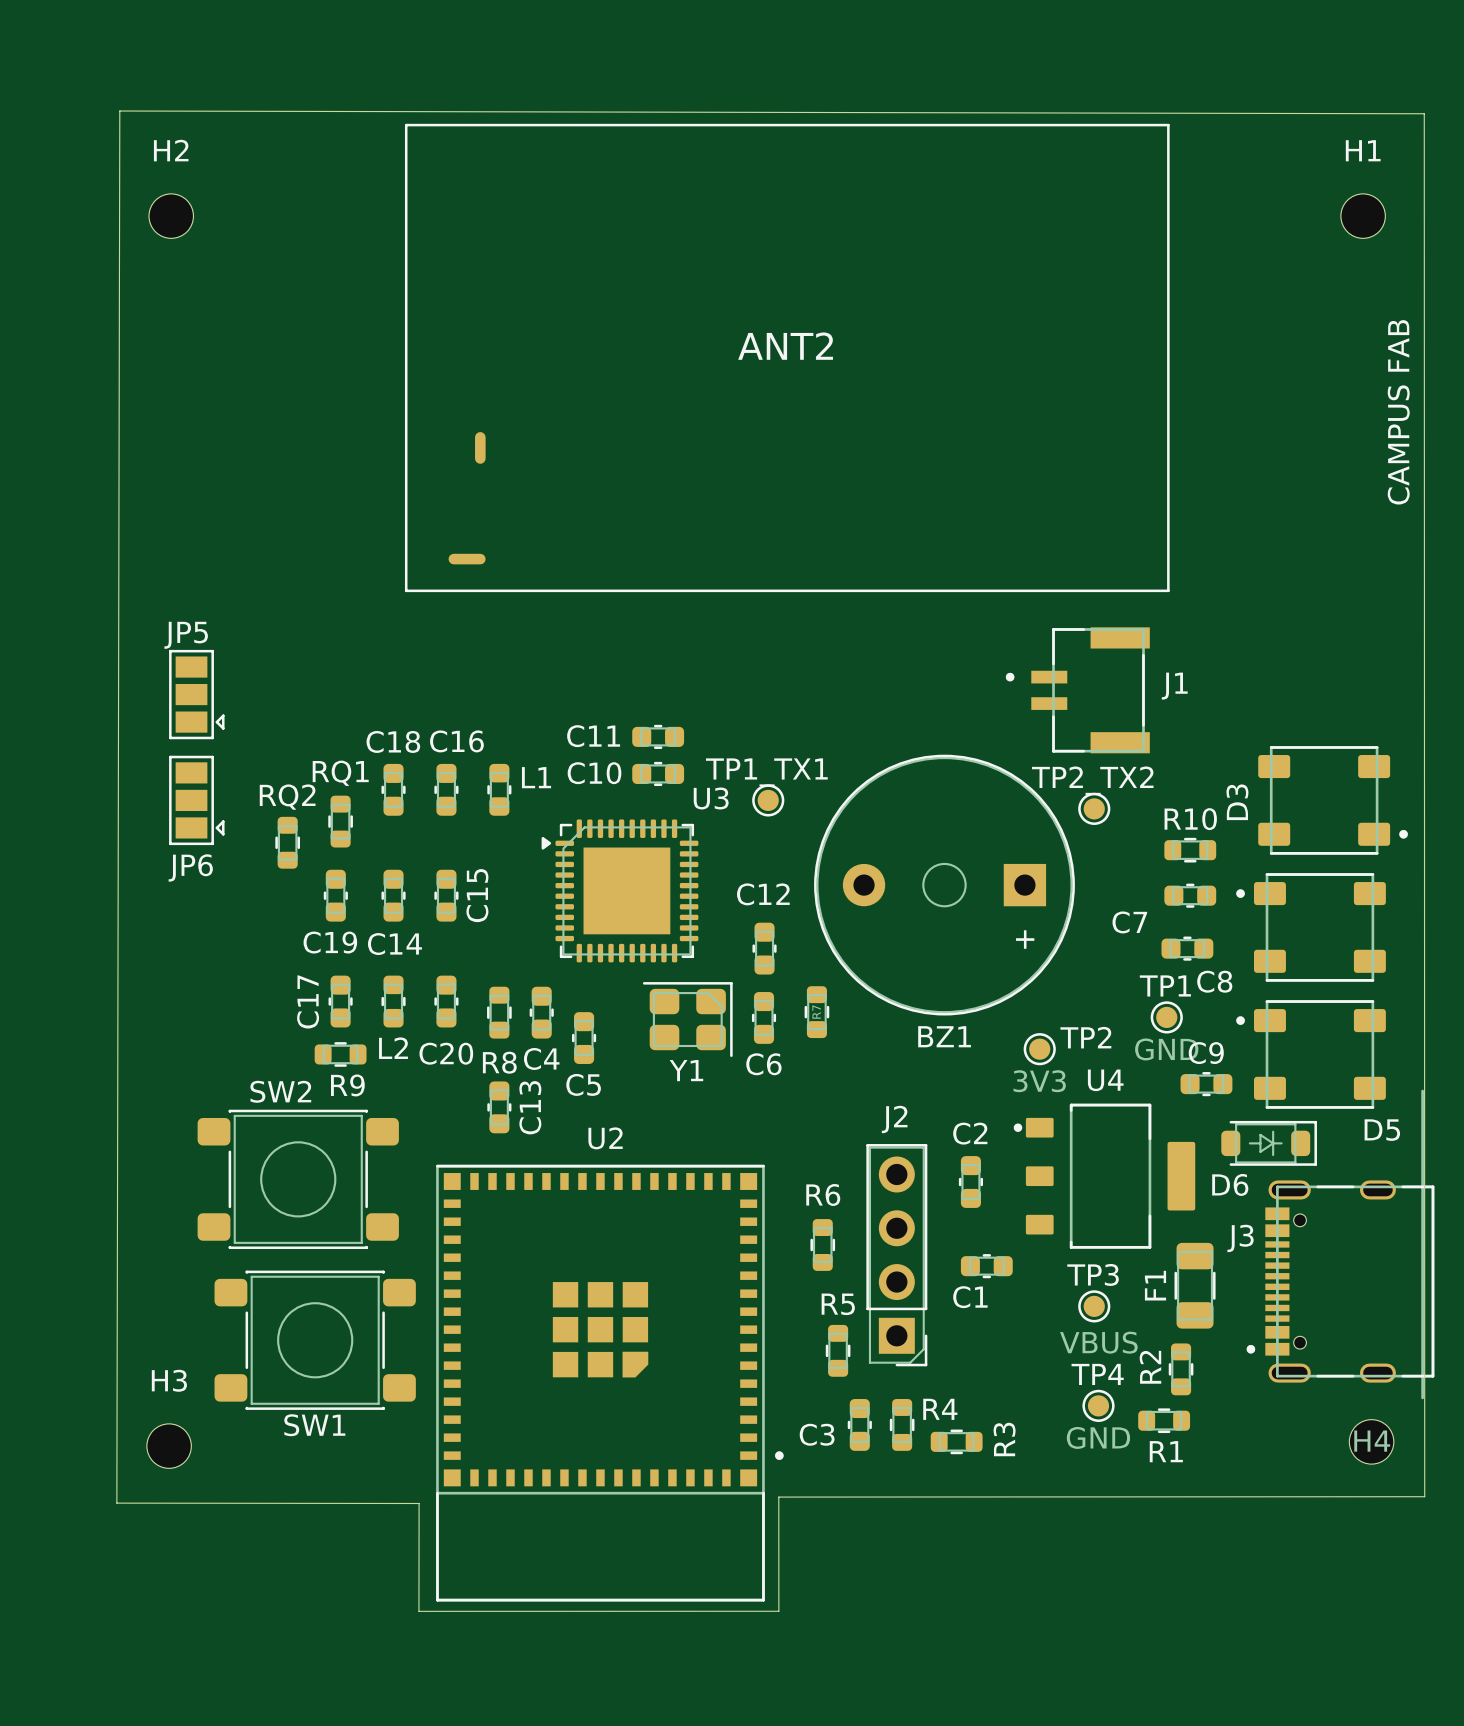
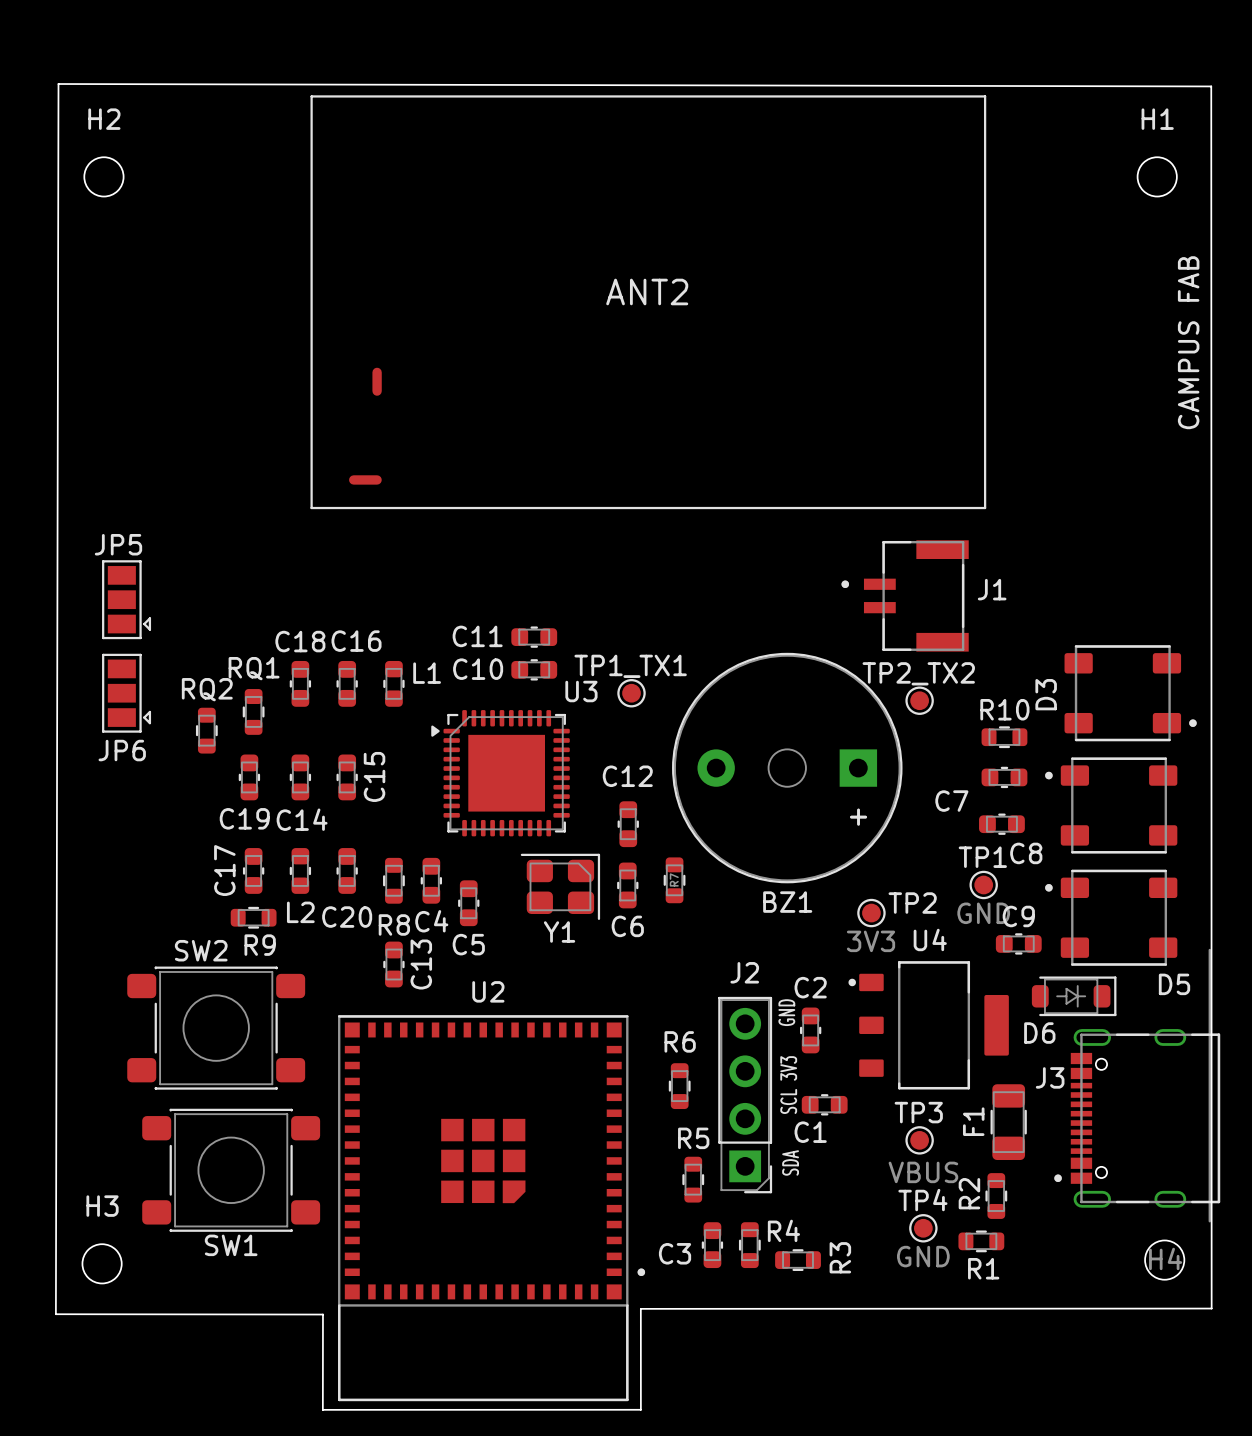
text: none -> GND (786, 1012)
text: none -> 3V3 (788, 1068)
text: none -> SCL (788, 1101)
text: none -> SDA (790, 1162)

